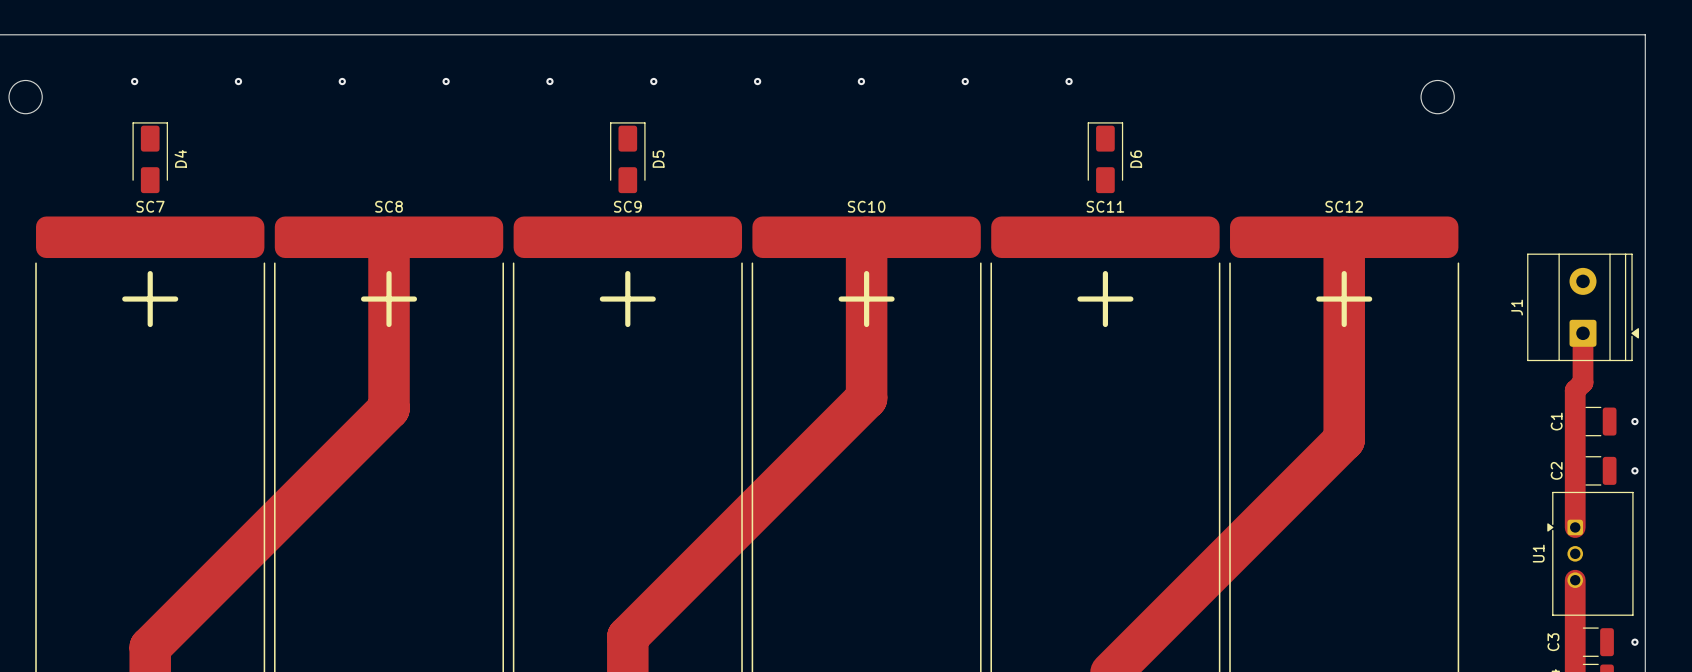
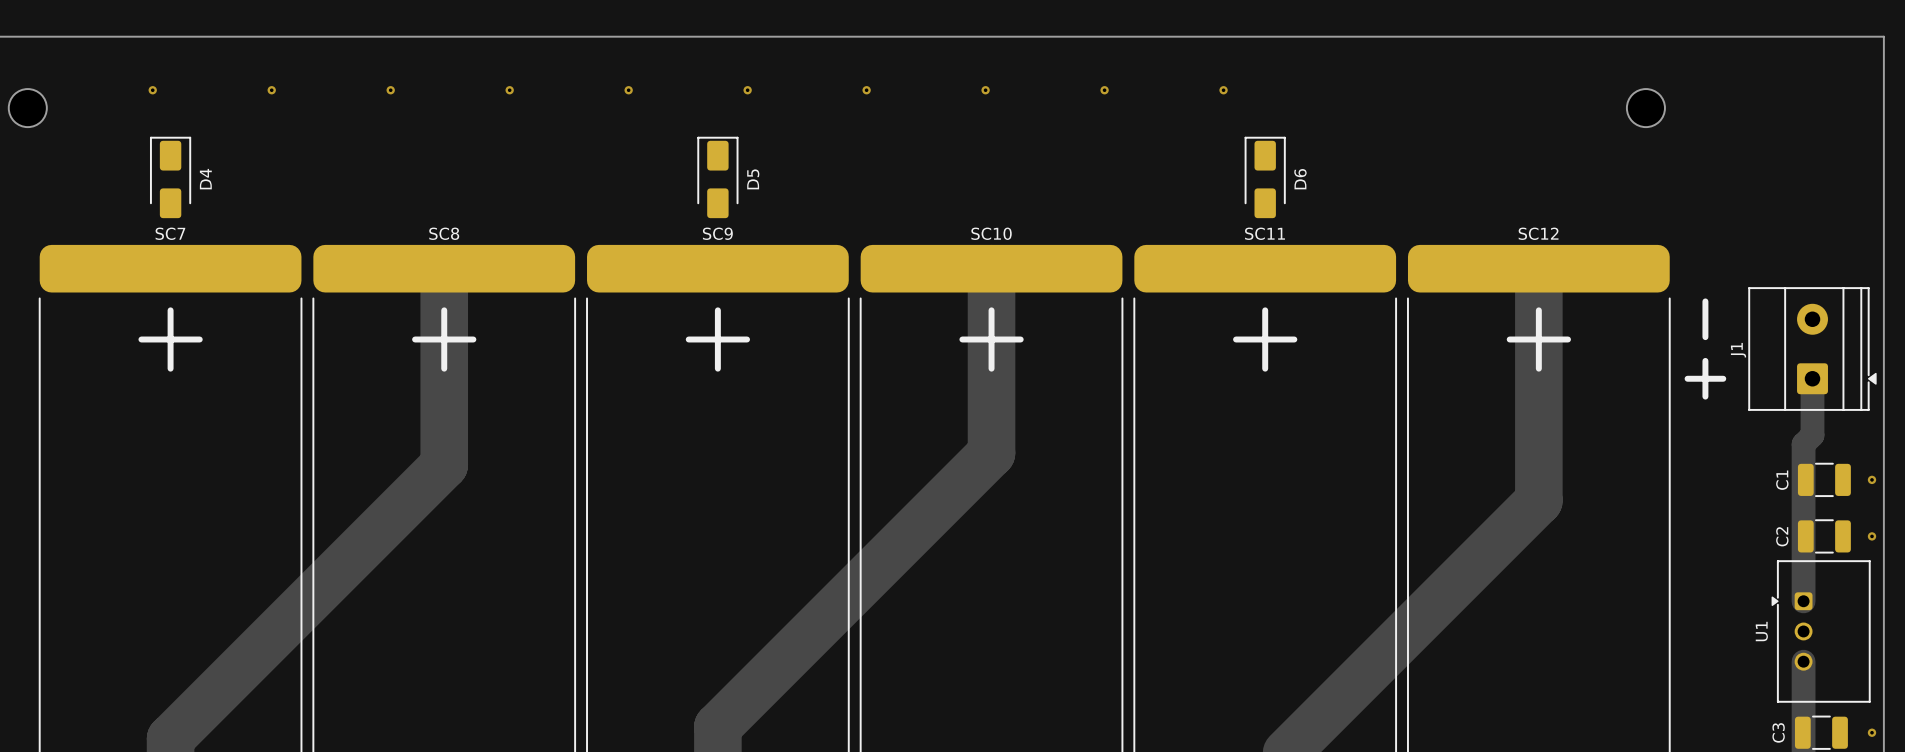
line: none -> (1705, 301) (1705, 337)
line: none -> (1705, 360) (1705, 396)
line: none -> (1687, 378) (1723, 378)

